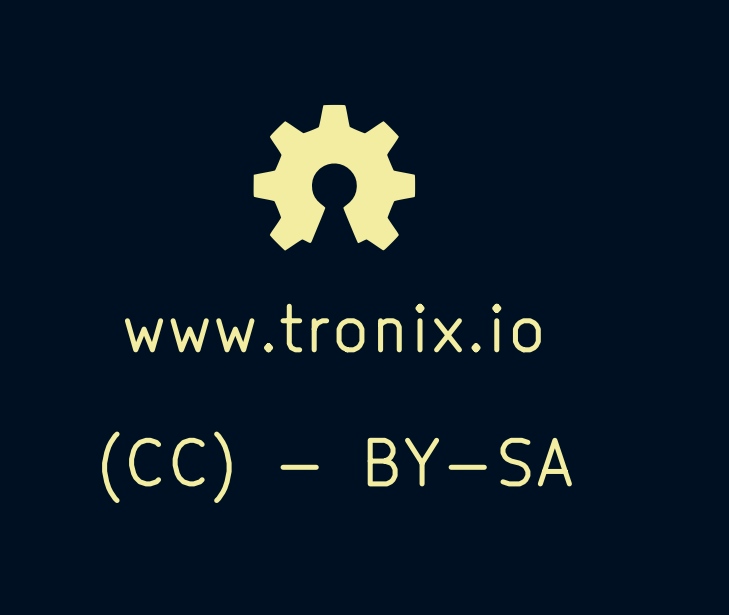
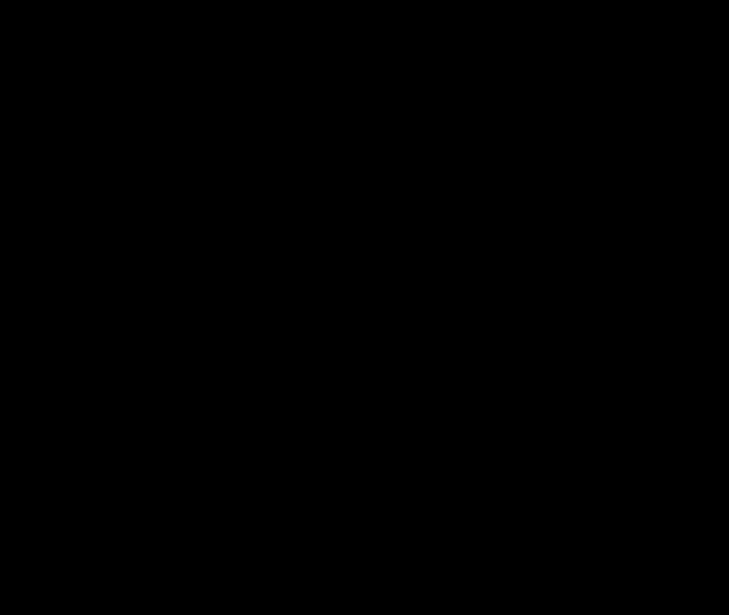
drawing: [253, 104, 416, 251] -> none
text: www.tronix.io (332, 328) -> none
text: (CC) - BY-SA (337, 467) -> none

